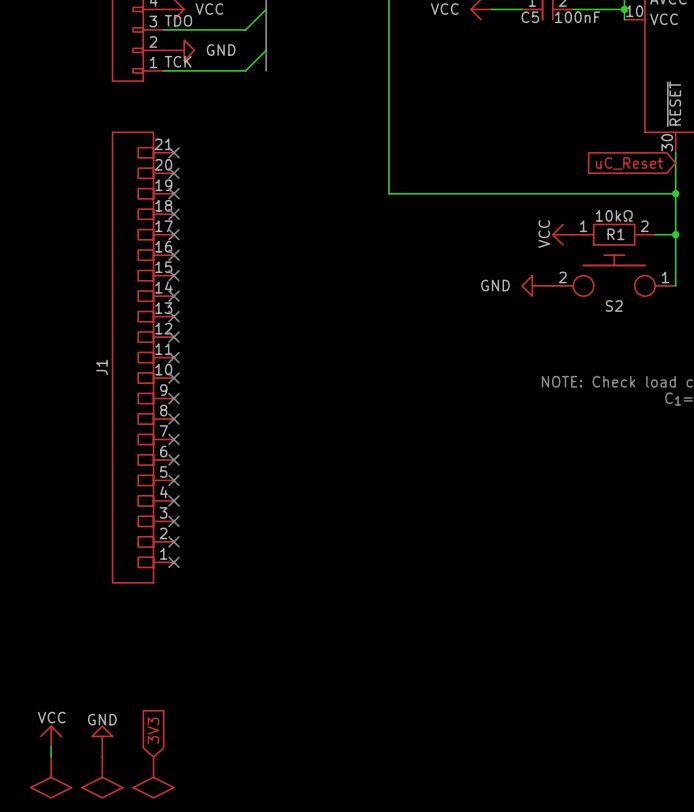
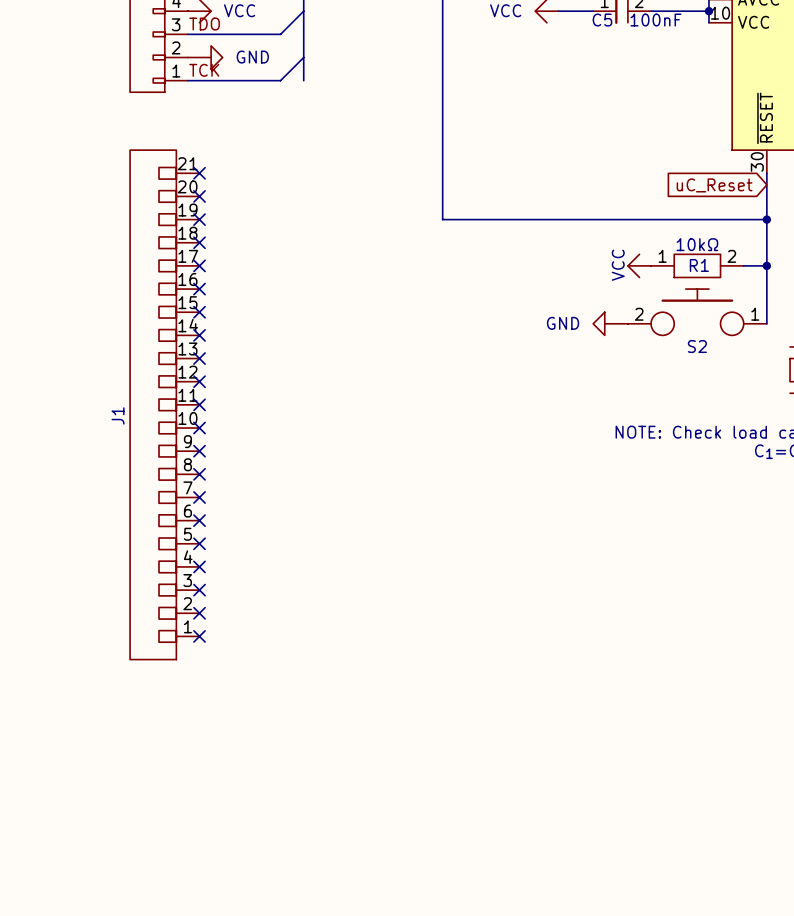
global label: 3V3 (153, 730) -> none
power symbol: VCC (51, 736) -> none
power symbol: GND (102, 741) -> none
wire: (51, 746) (51, 756) -> none
power symbol: (51, 777) -> none
power symbol: (102, 777) -> none
power symbol: (153, 777) -> none

